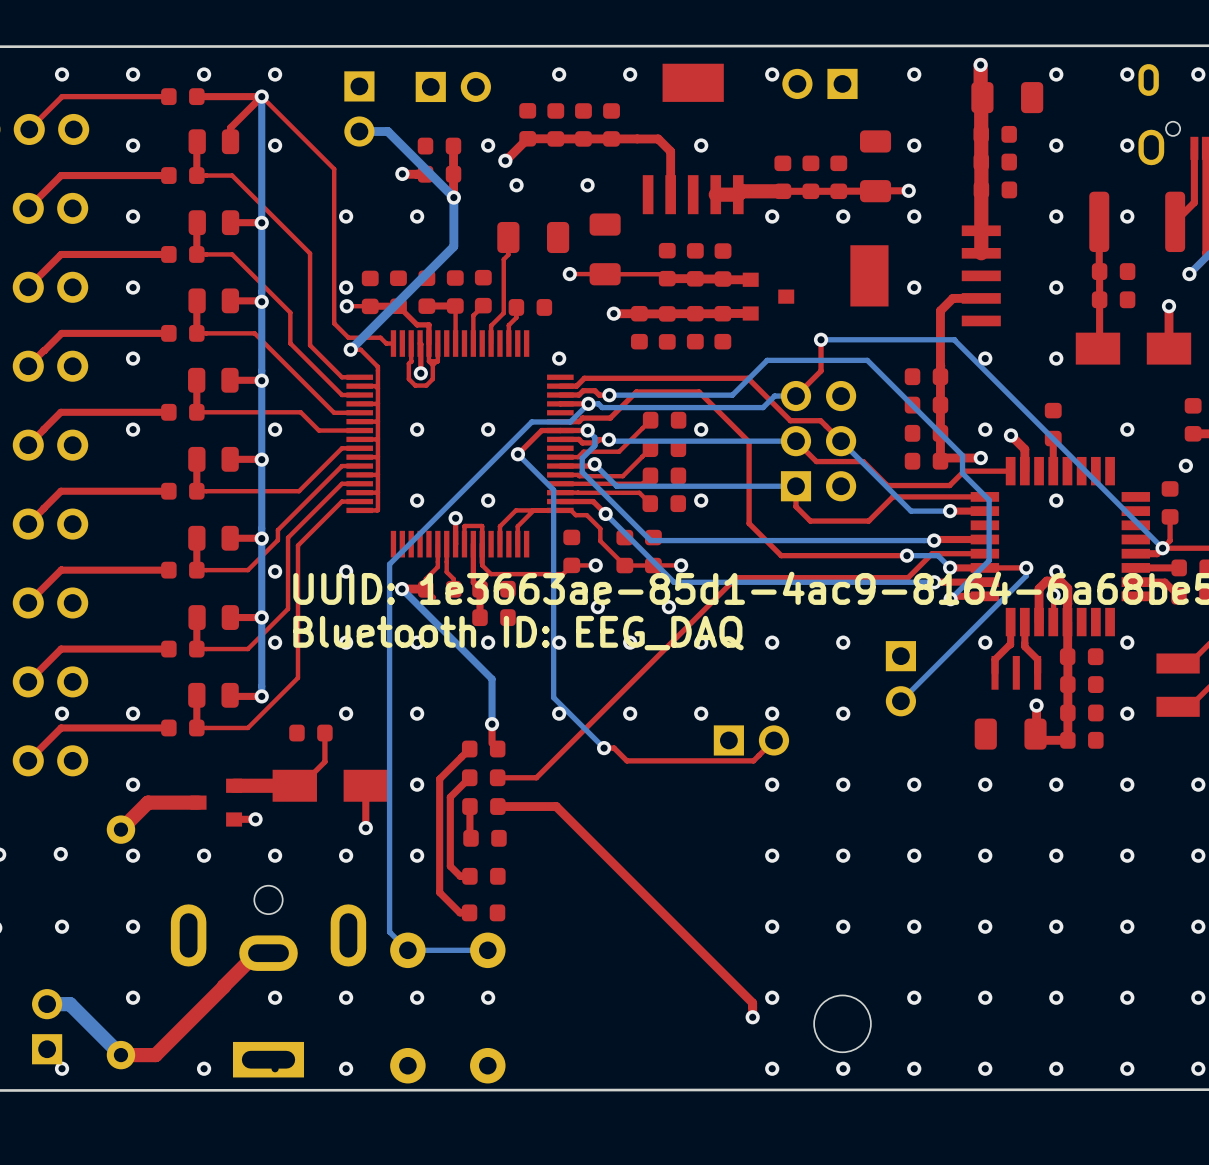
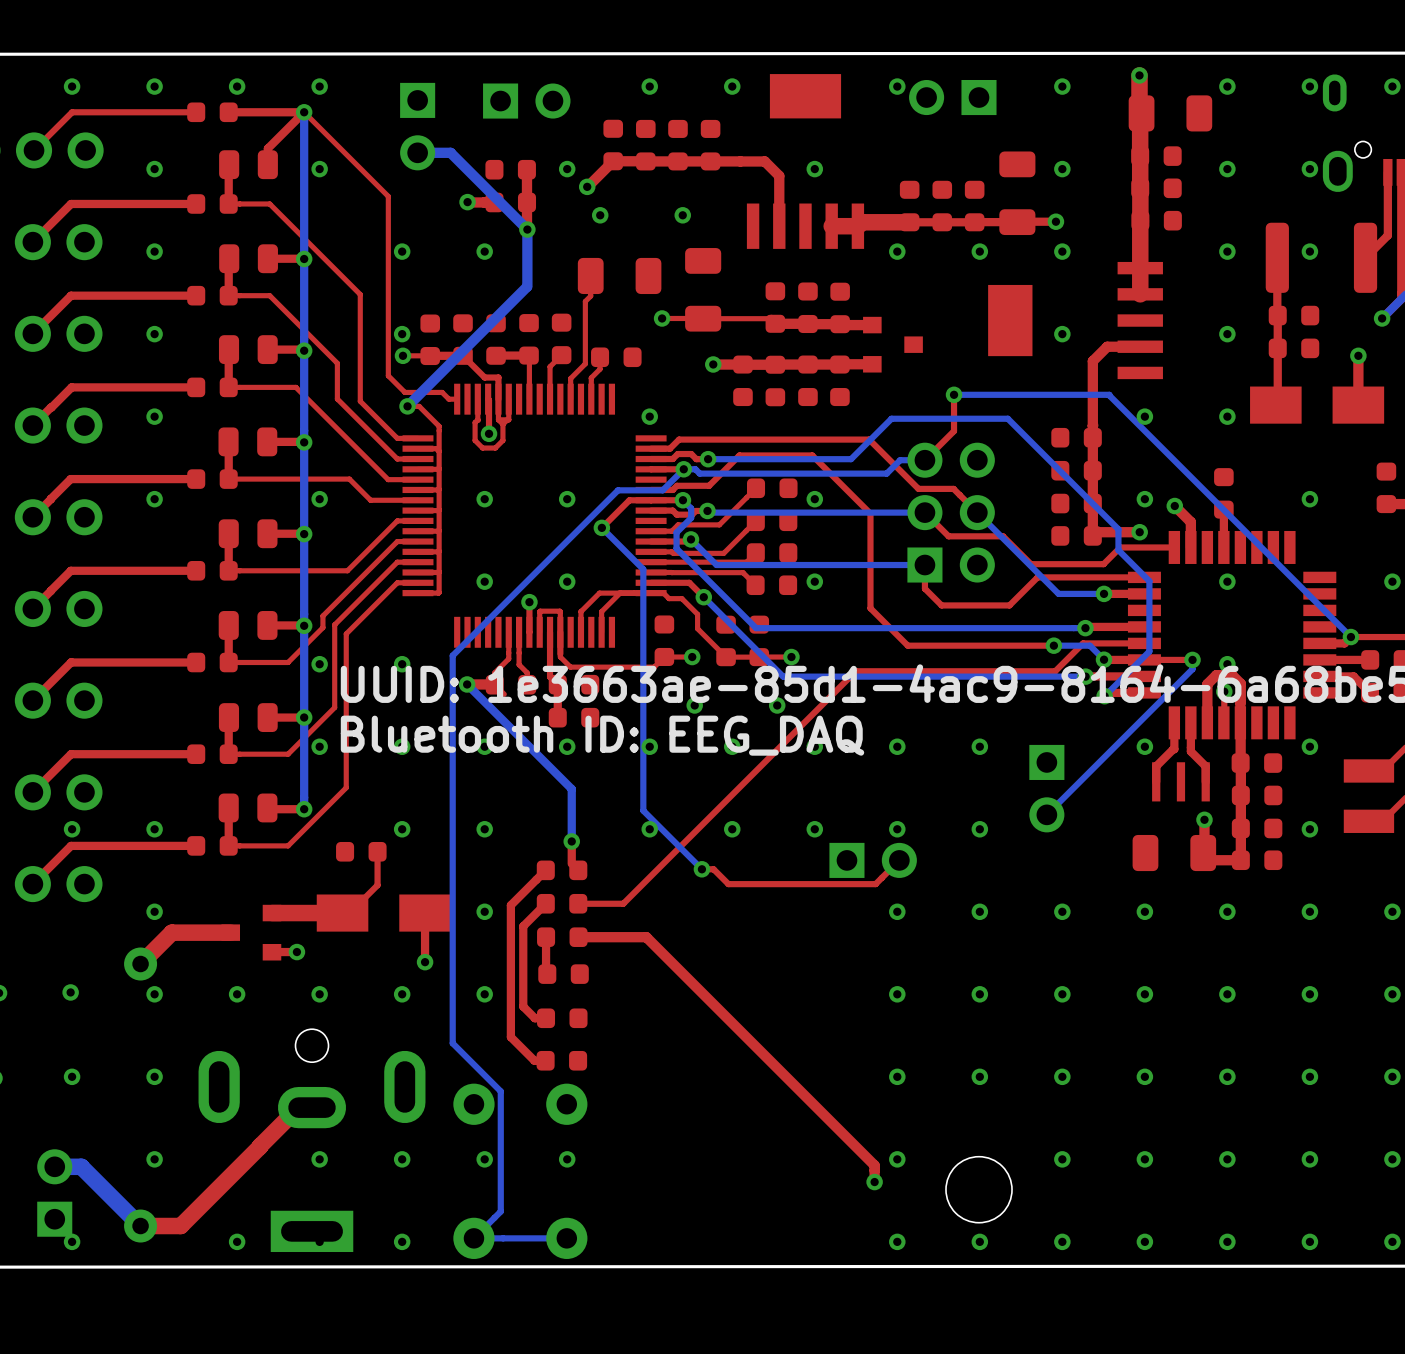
via position: (1185, 465) -> (1392, 581)
part: (1170, 502) -> none
top track: (1170, 516) (1170, 540) (1162, 548) -> none
bottom track: (389, 897) (389, 932) (407, 950) (487, 950) -> (452, 1043) (500, 1091) (500, 1211) (473, 1238) (566, 1238)

